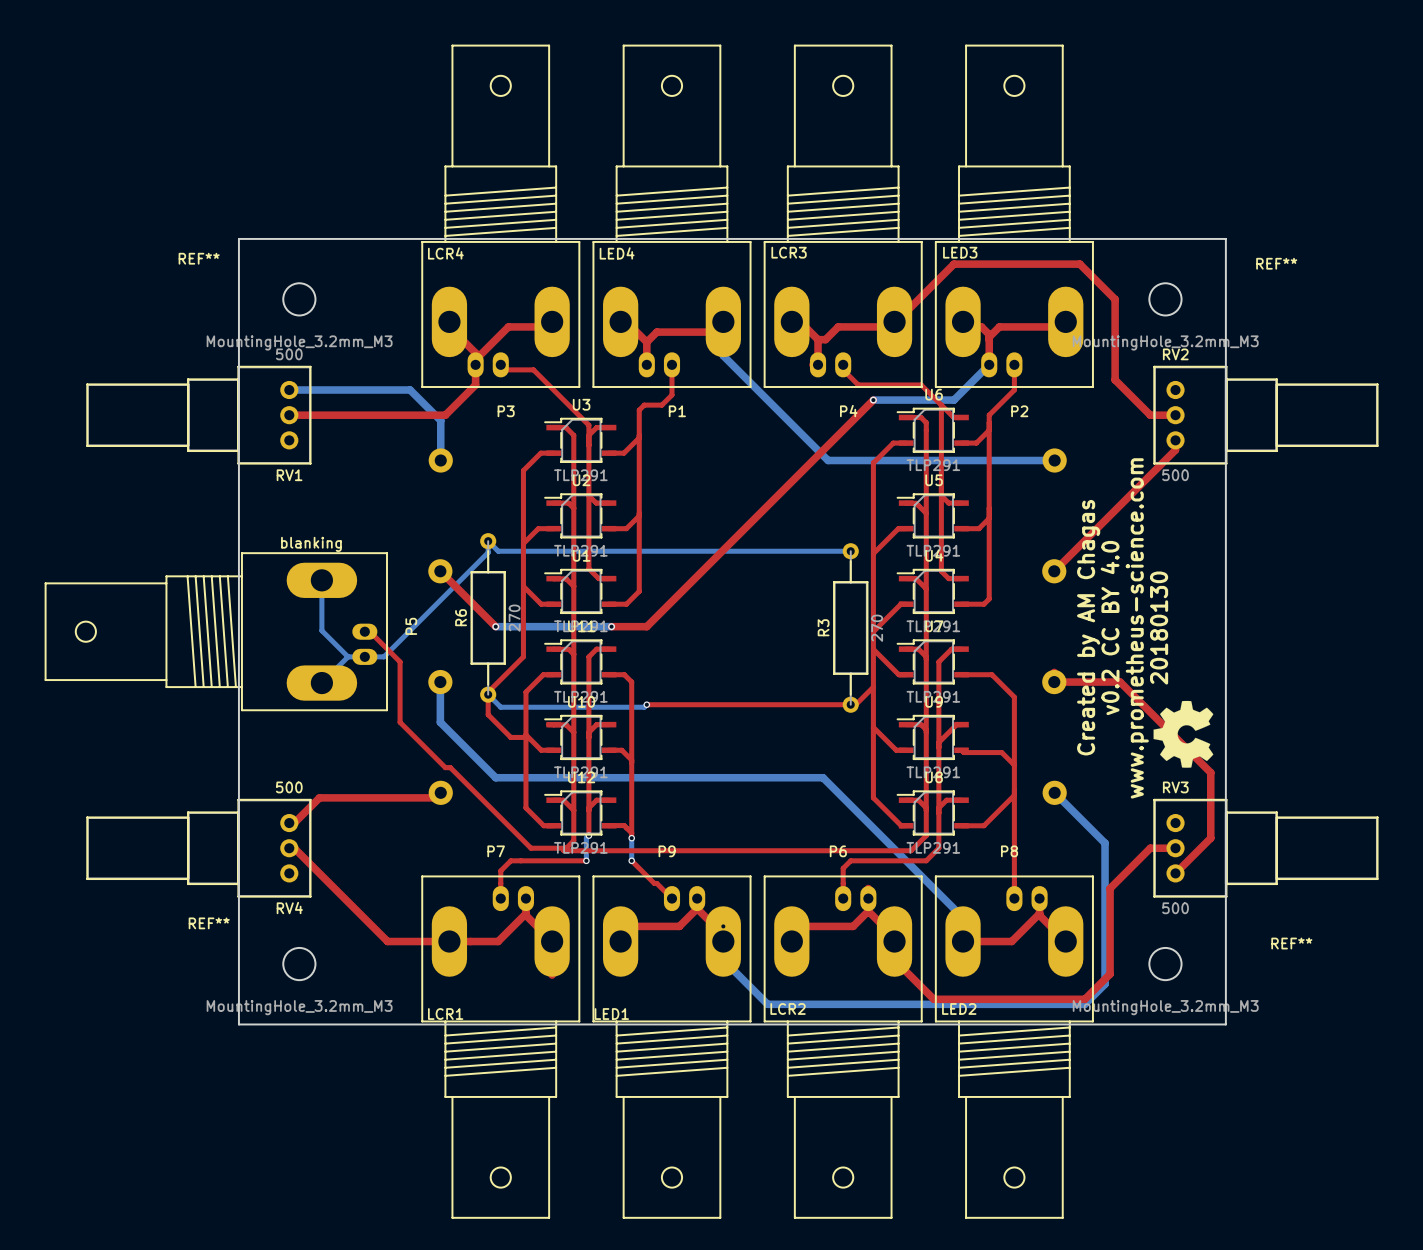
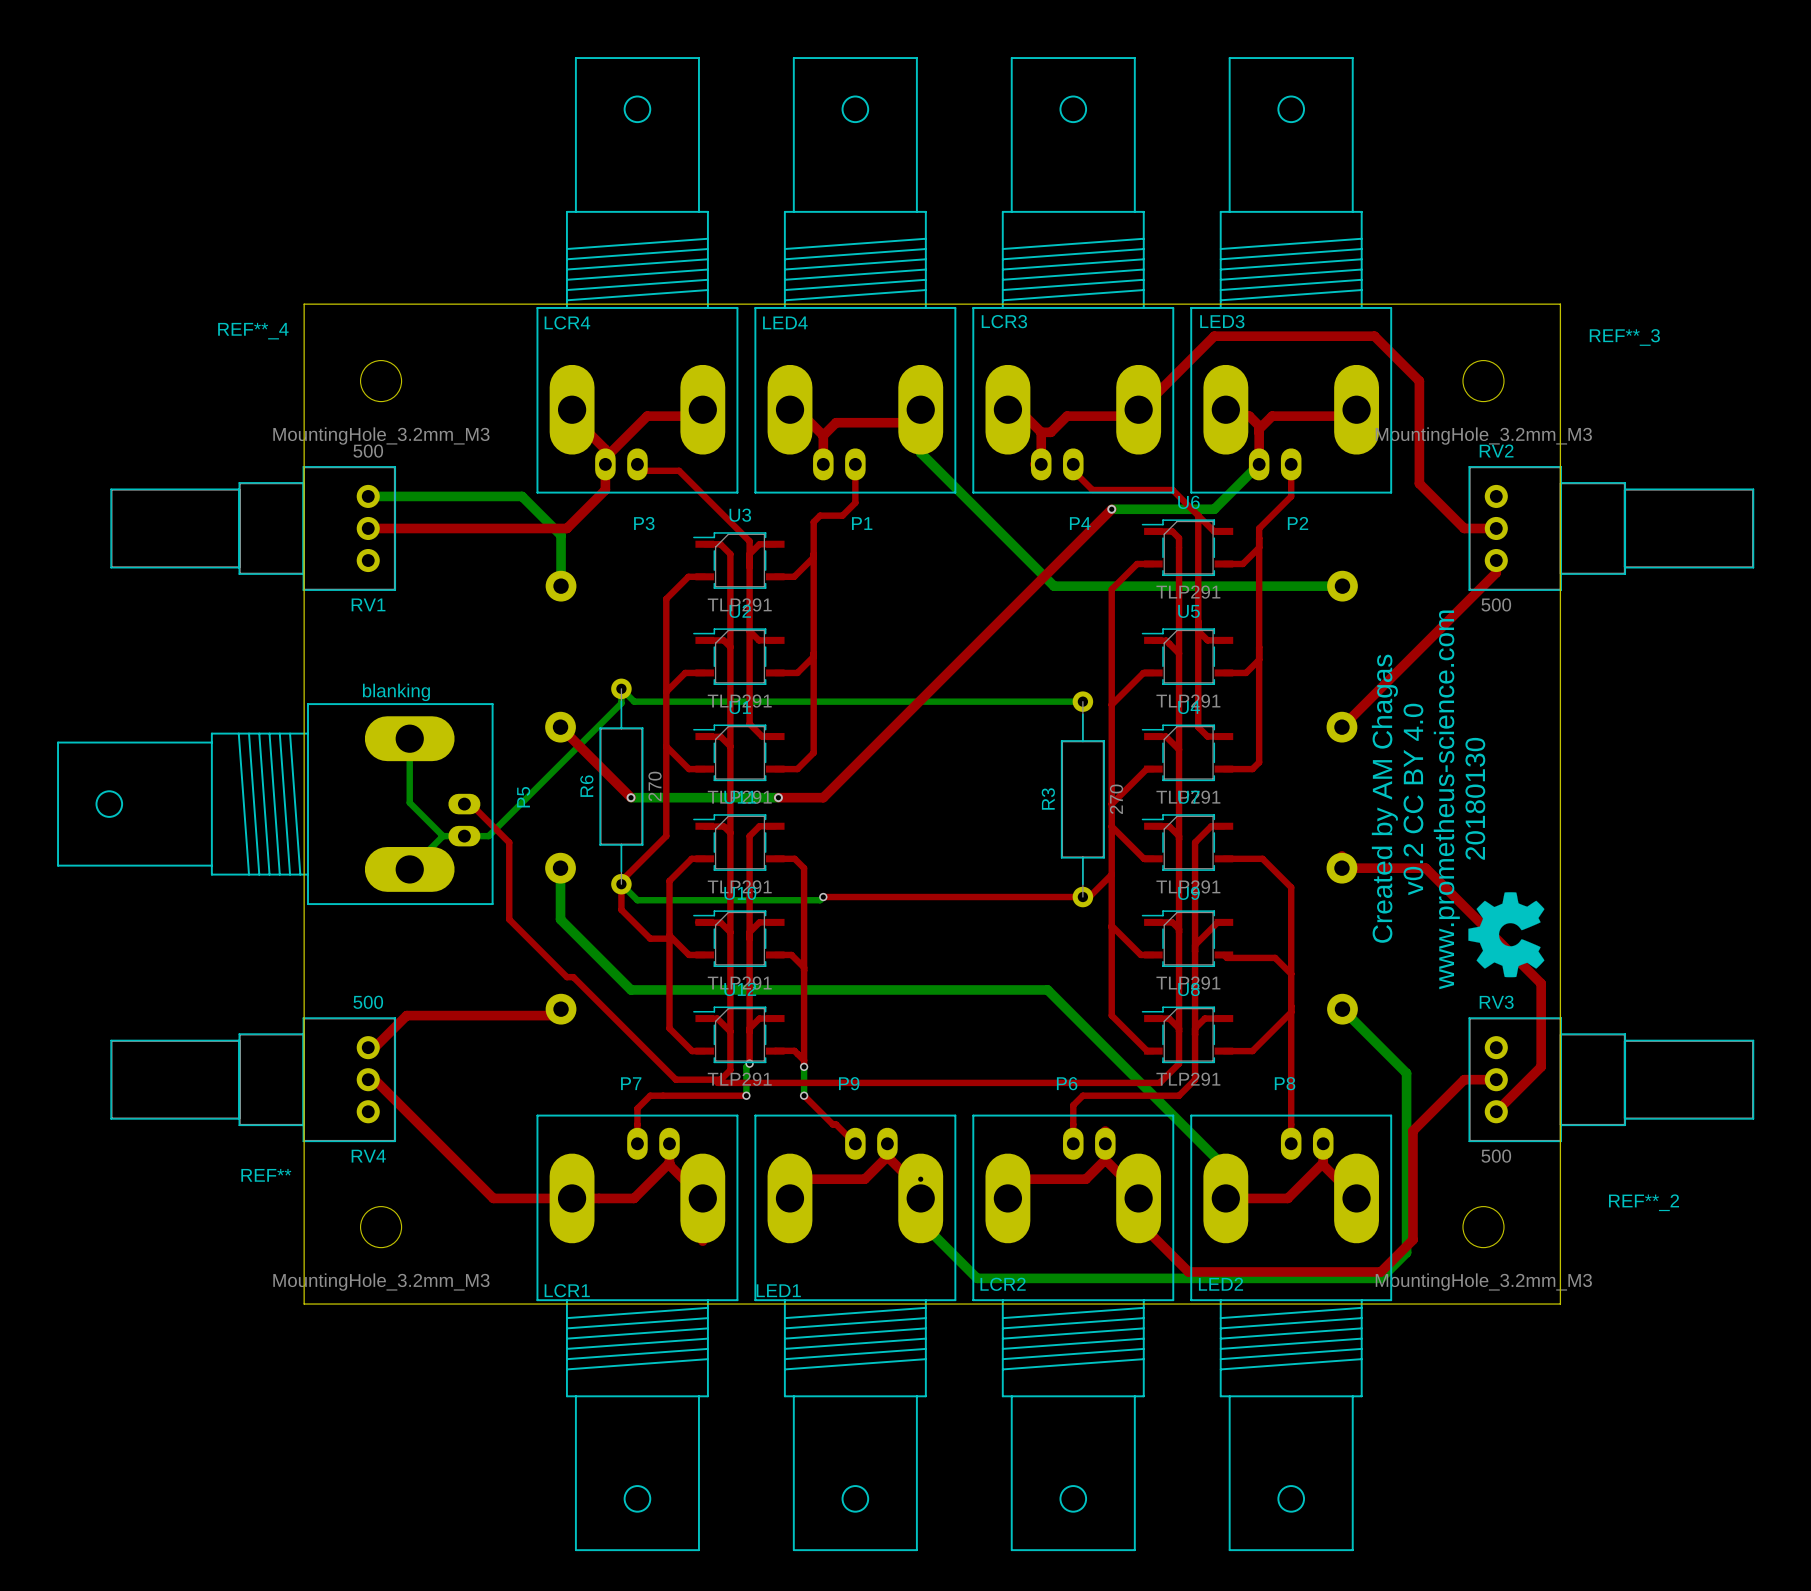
REF** name: REF** (199, 258) -> REF**_4 (253, 331)
REF** name: REF** (1276, 263) -> REF**_3 (1624, 337)
REF** name: REF** (1291, 943) -> REF**_2 (1644, 1202)

